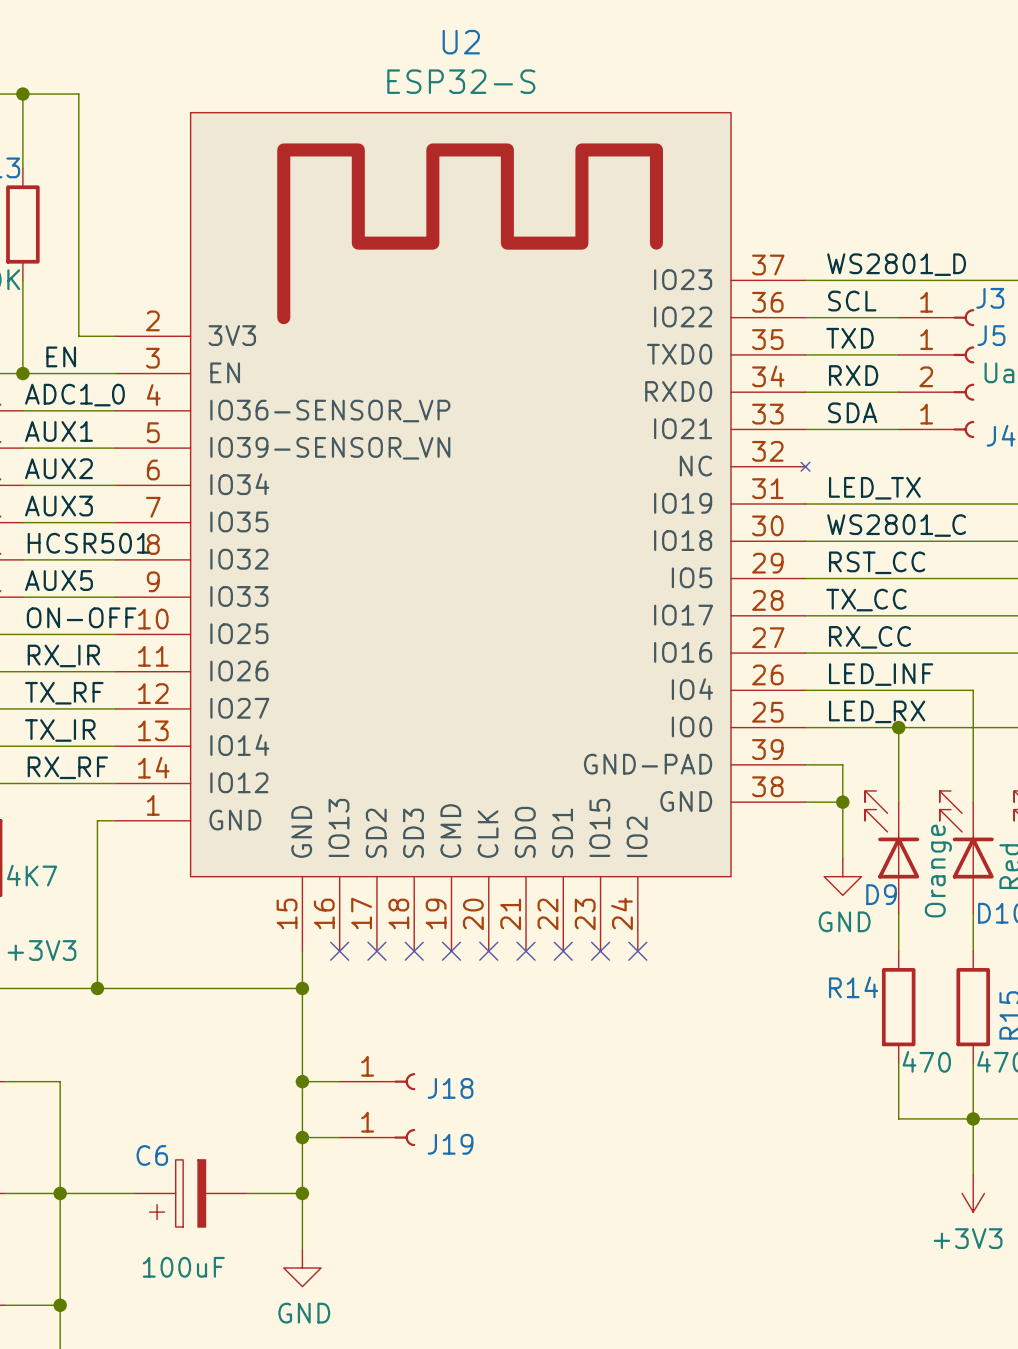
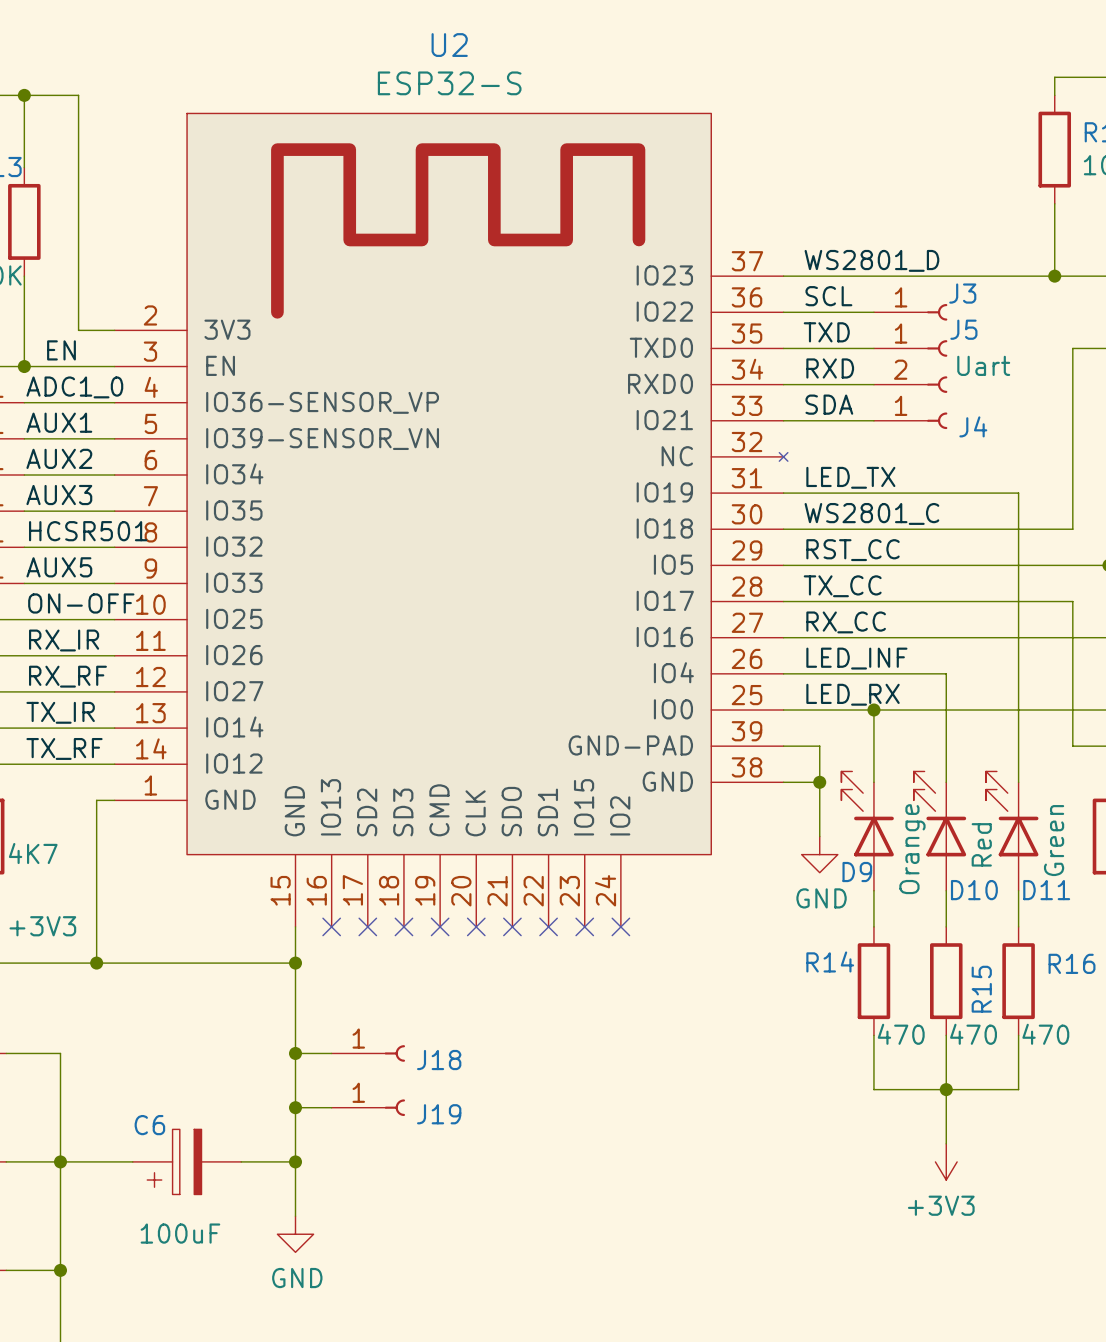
label: TX_RF (64, 693) -> RX_RF (67, 676)
label: RX_RF (67, 767) -> TX_RF (64, 748)

